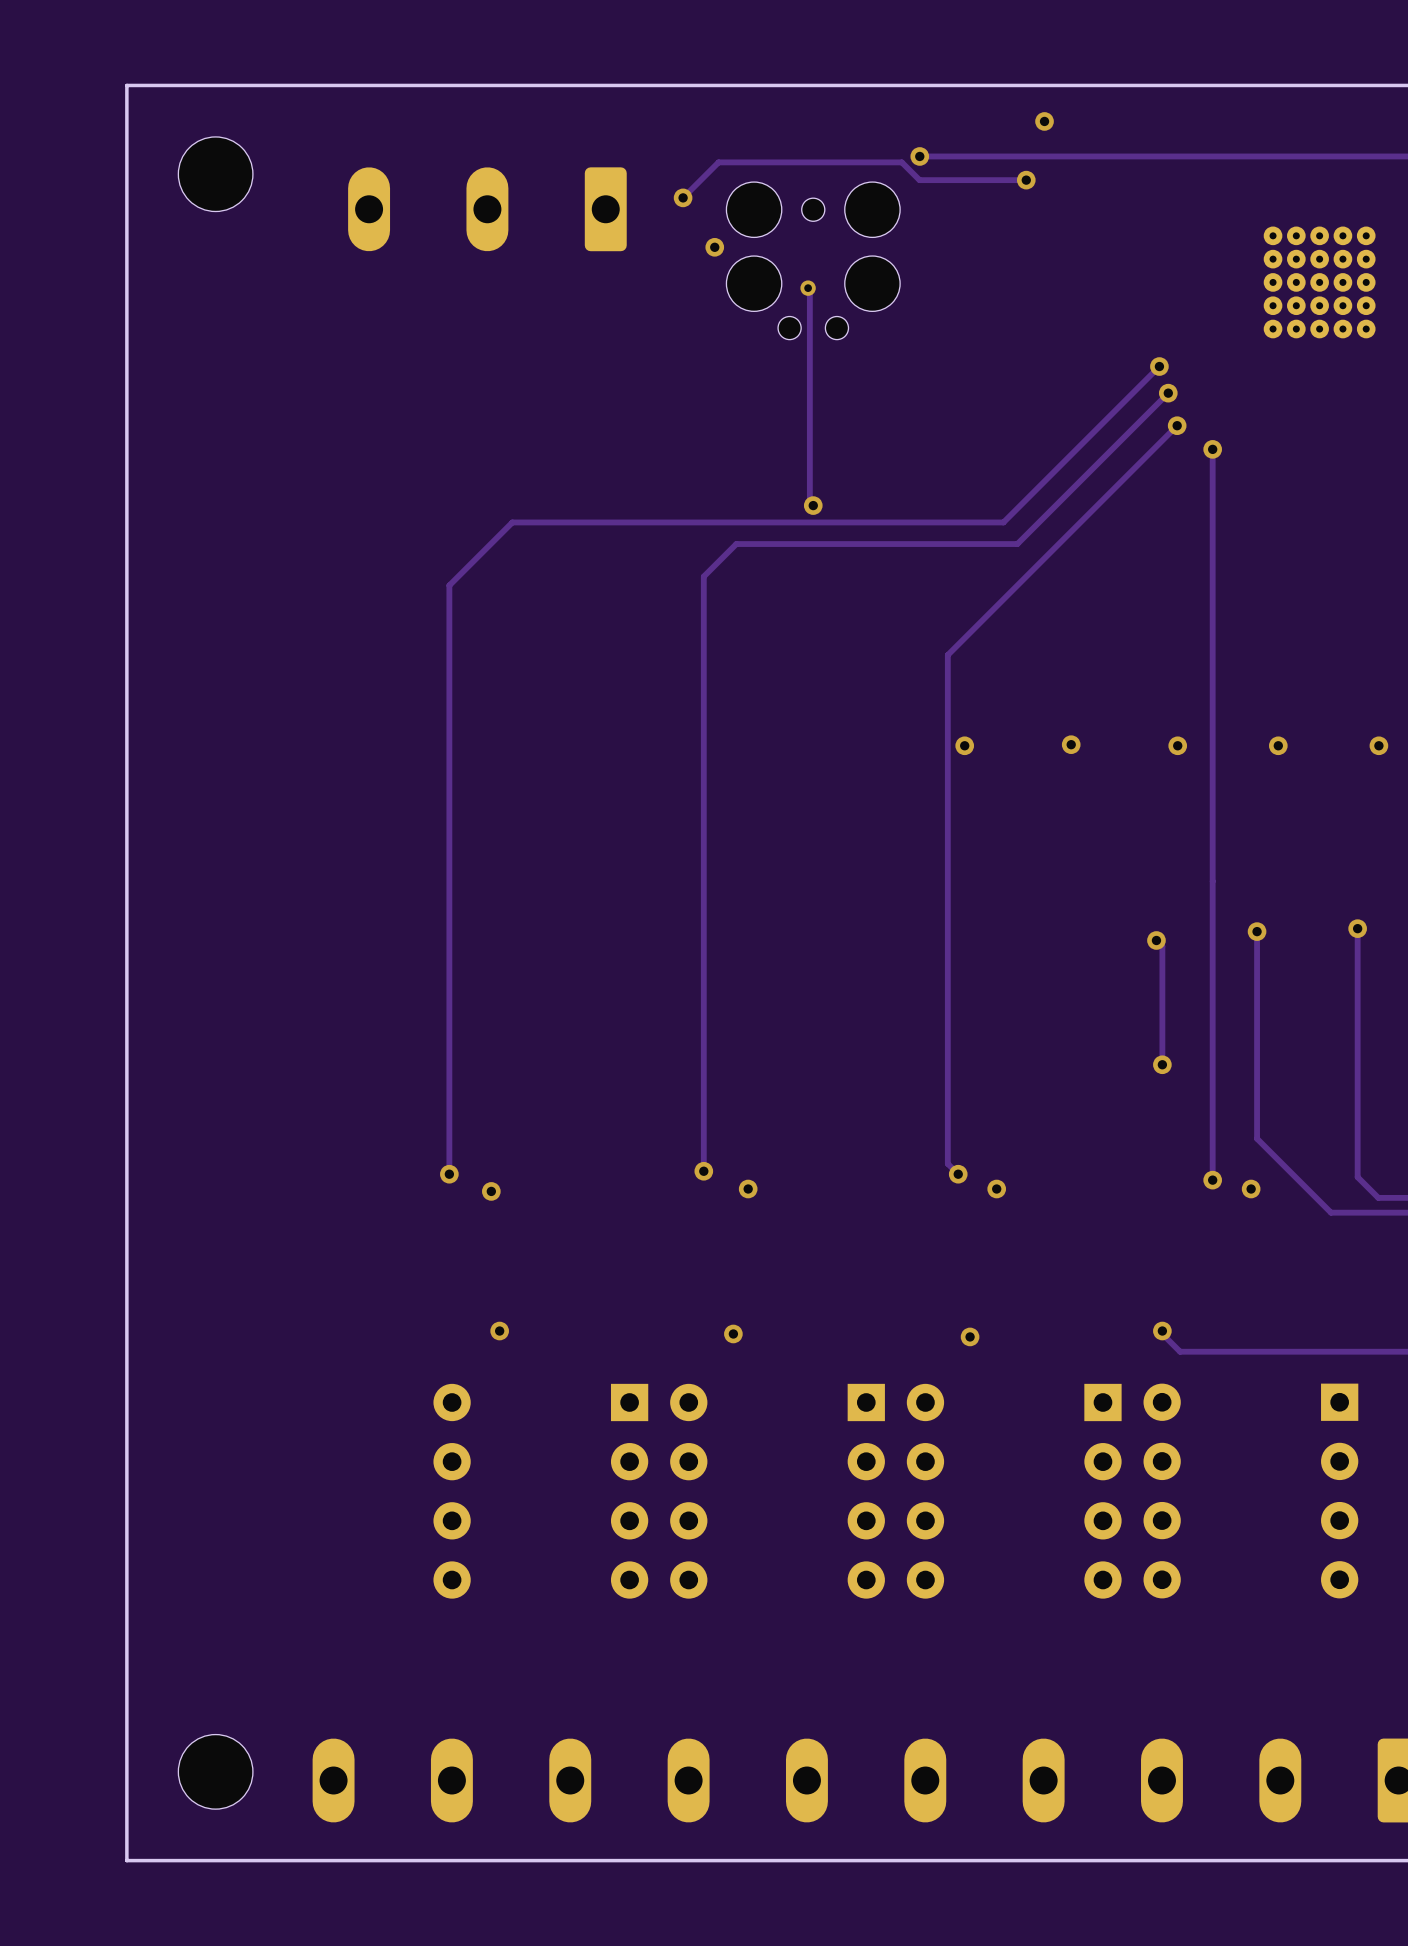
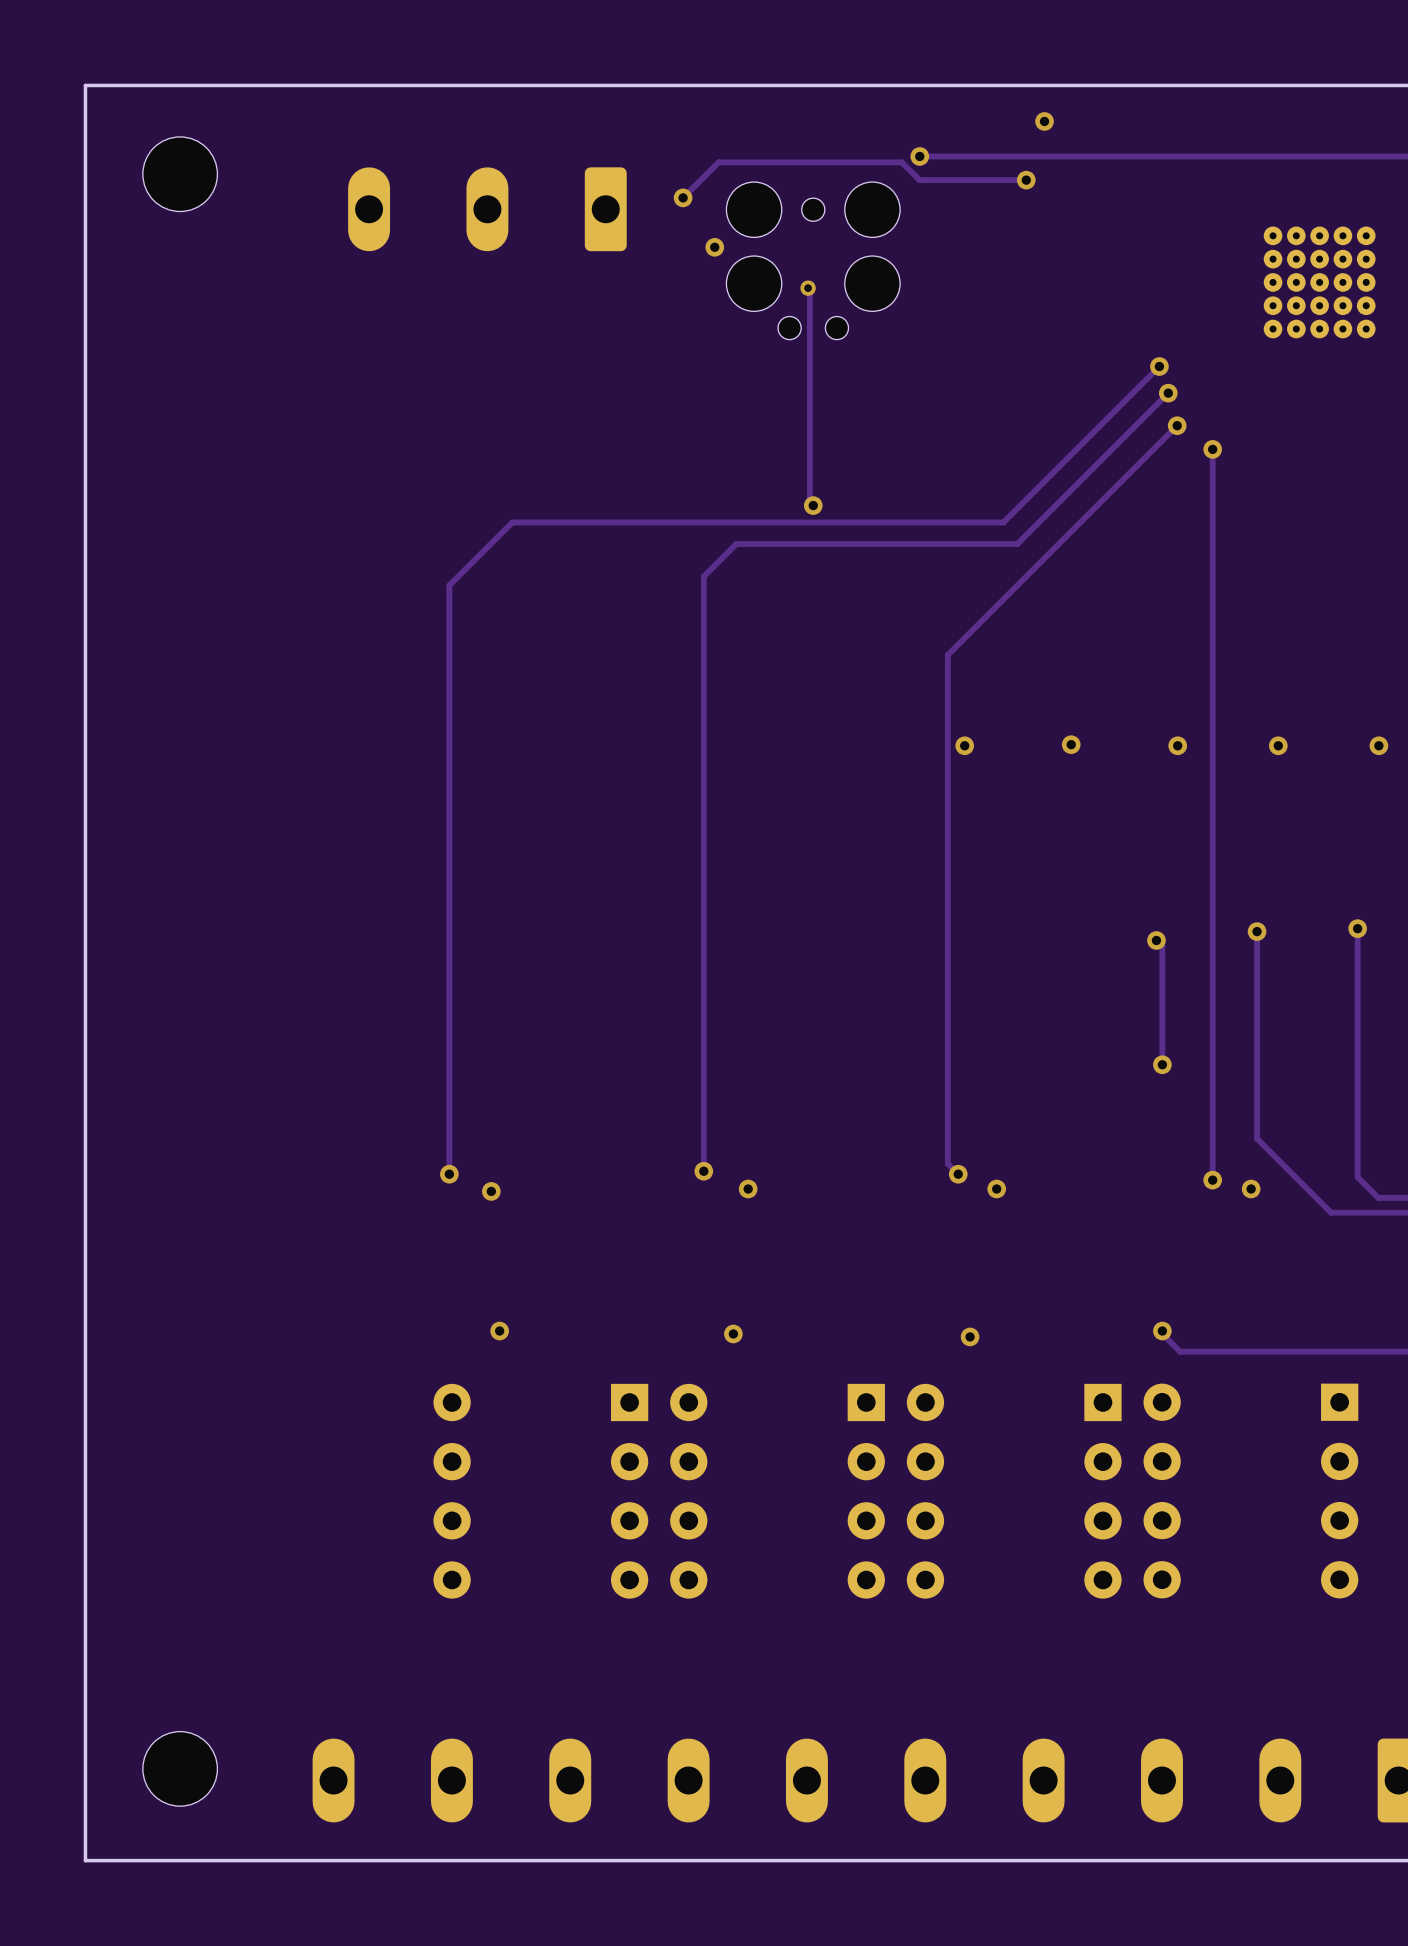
board edge: (126, 85) (126, 1860) -> (126, 85) (85, 85) (85, 1860) (126, 1860)
part position: (215, 174) -> (180, 174)
part position: (215, 1771) -> (180, 1768)

